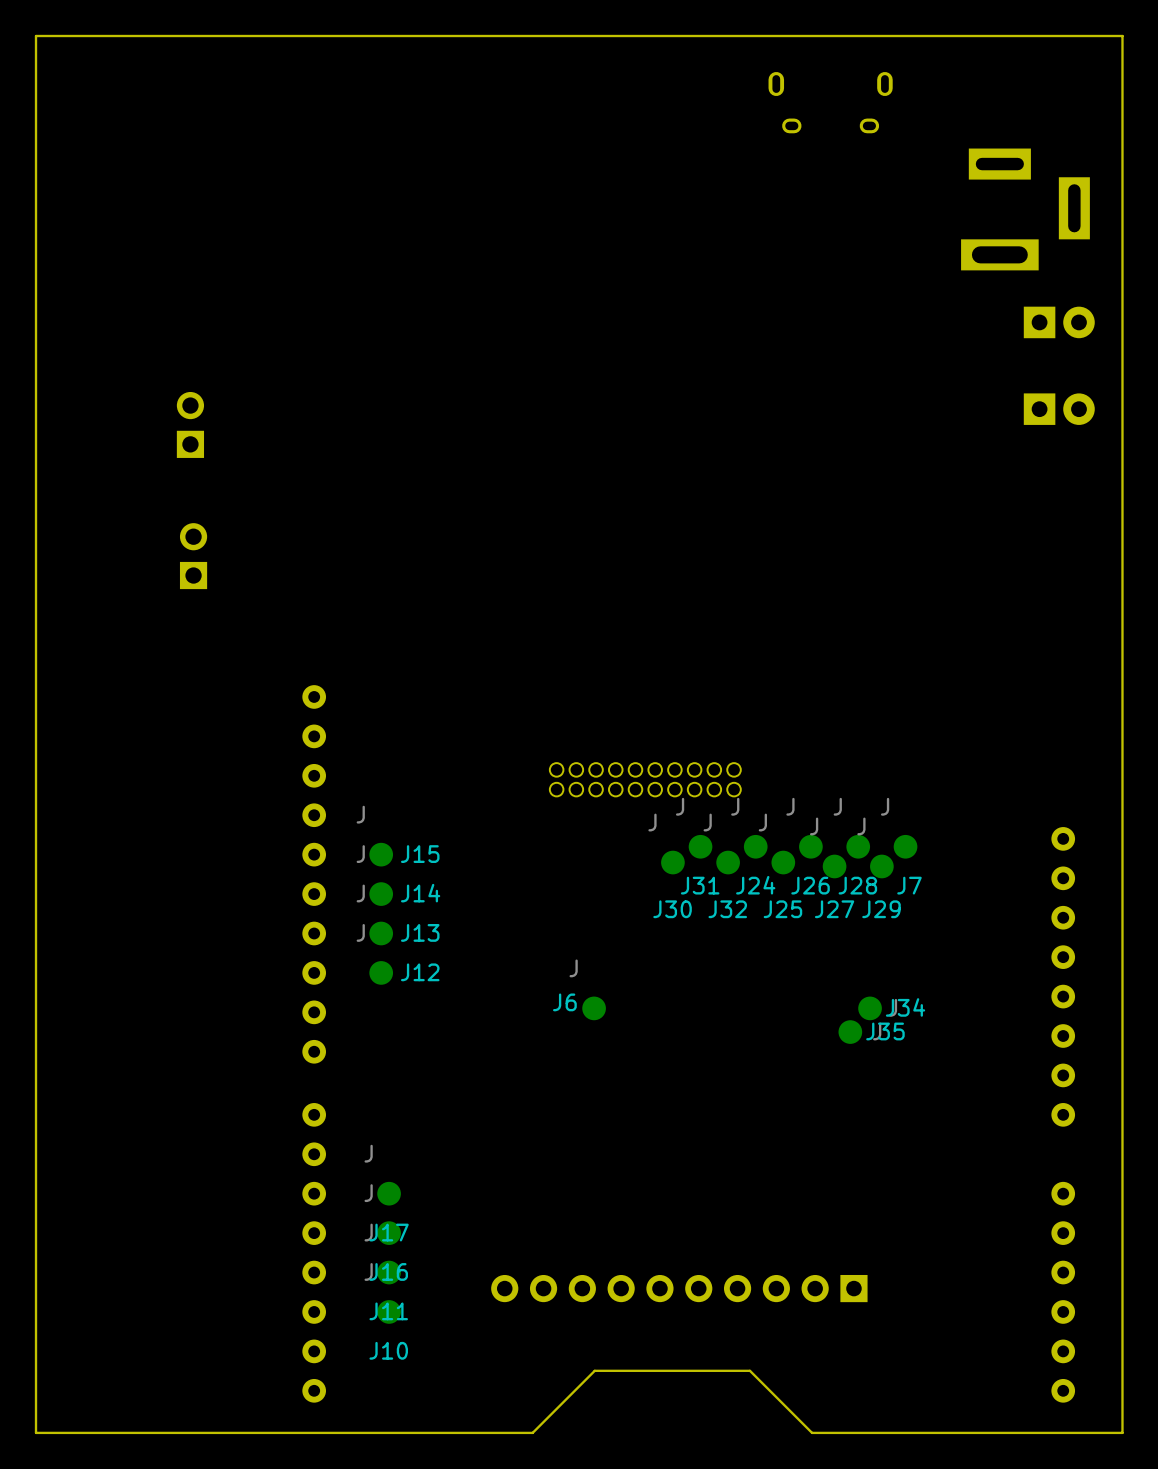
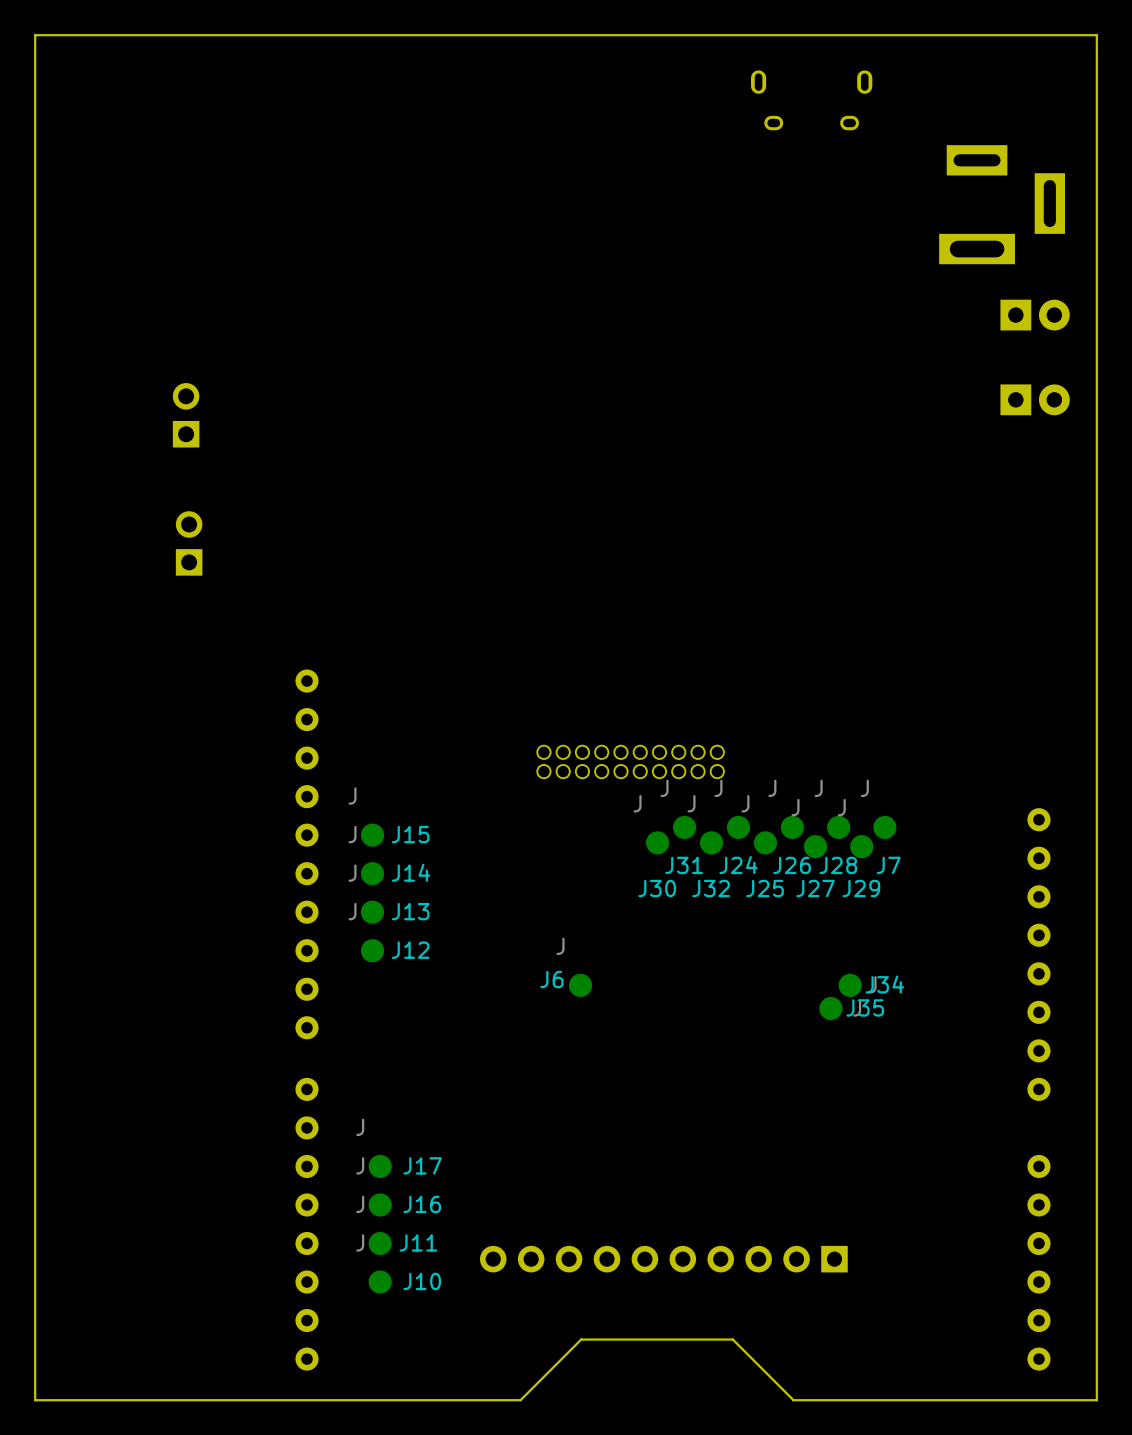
J17 name position: J17 (389, 1232) -> J17 (422, 1165)
J16 name position: J16 (388, 1271) -> J16 (422, 1204)
J11 name position: J11 (388, 1311) -> J11 (418, 1242)
J10 name position: J10 (388, 1350) -> J10 (422, 1281)

